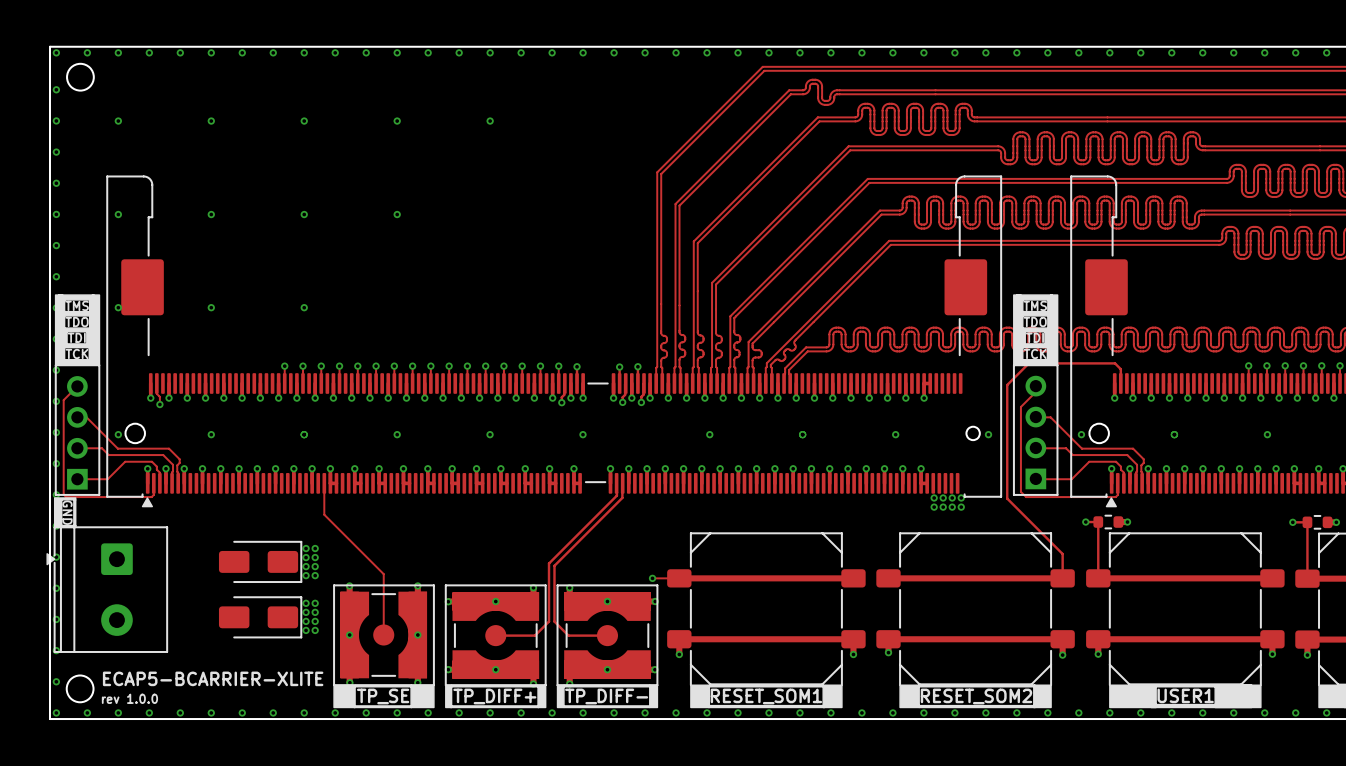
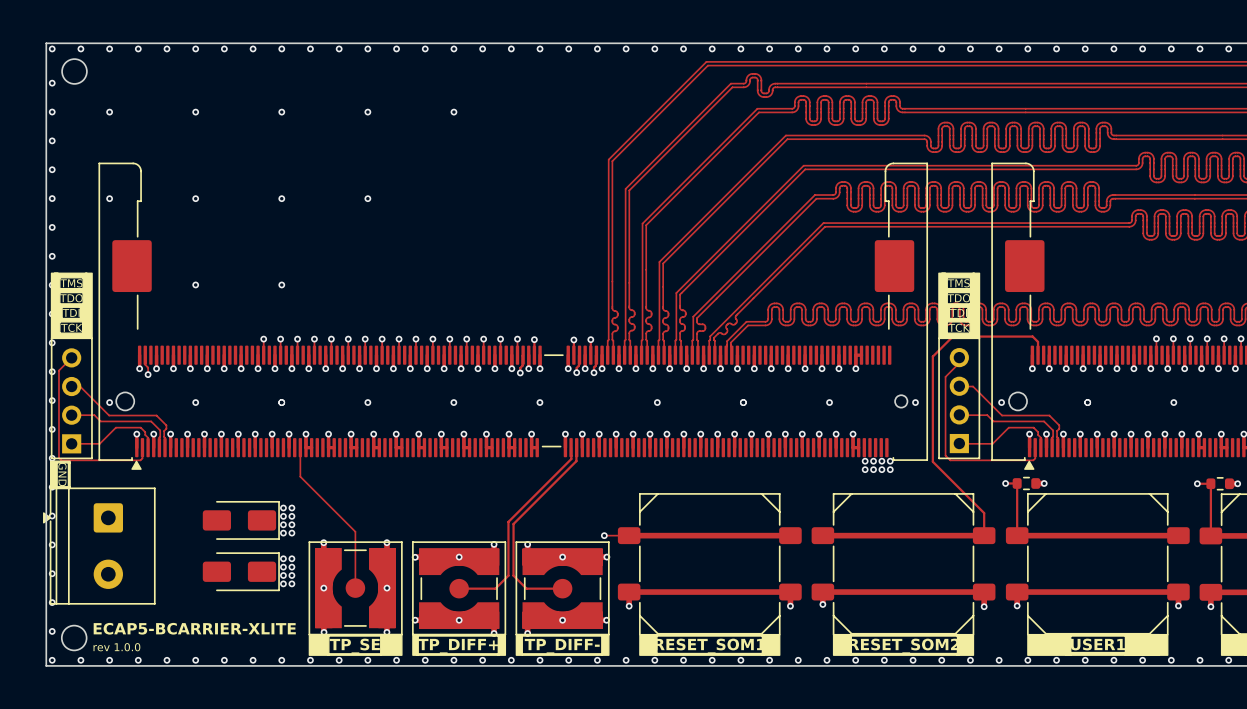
via: (118, 307) -> none

